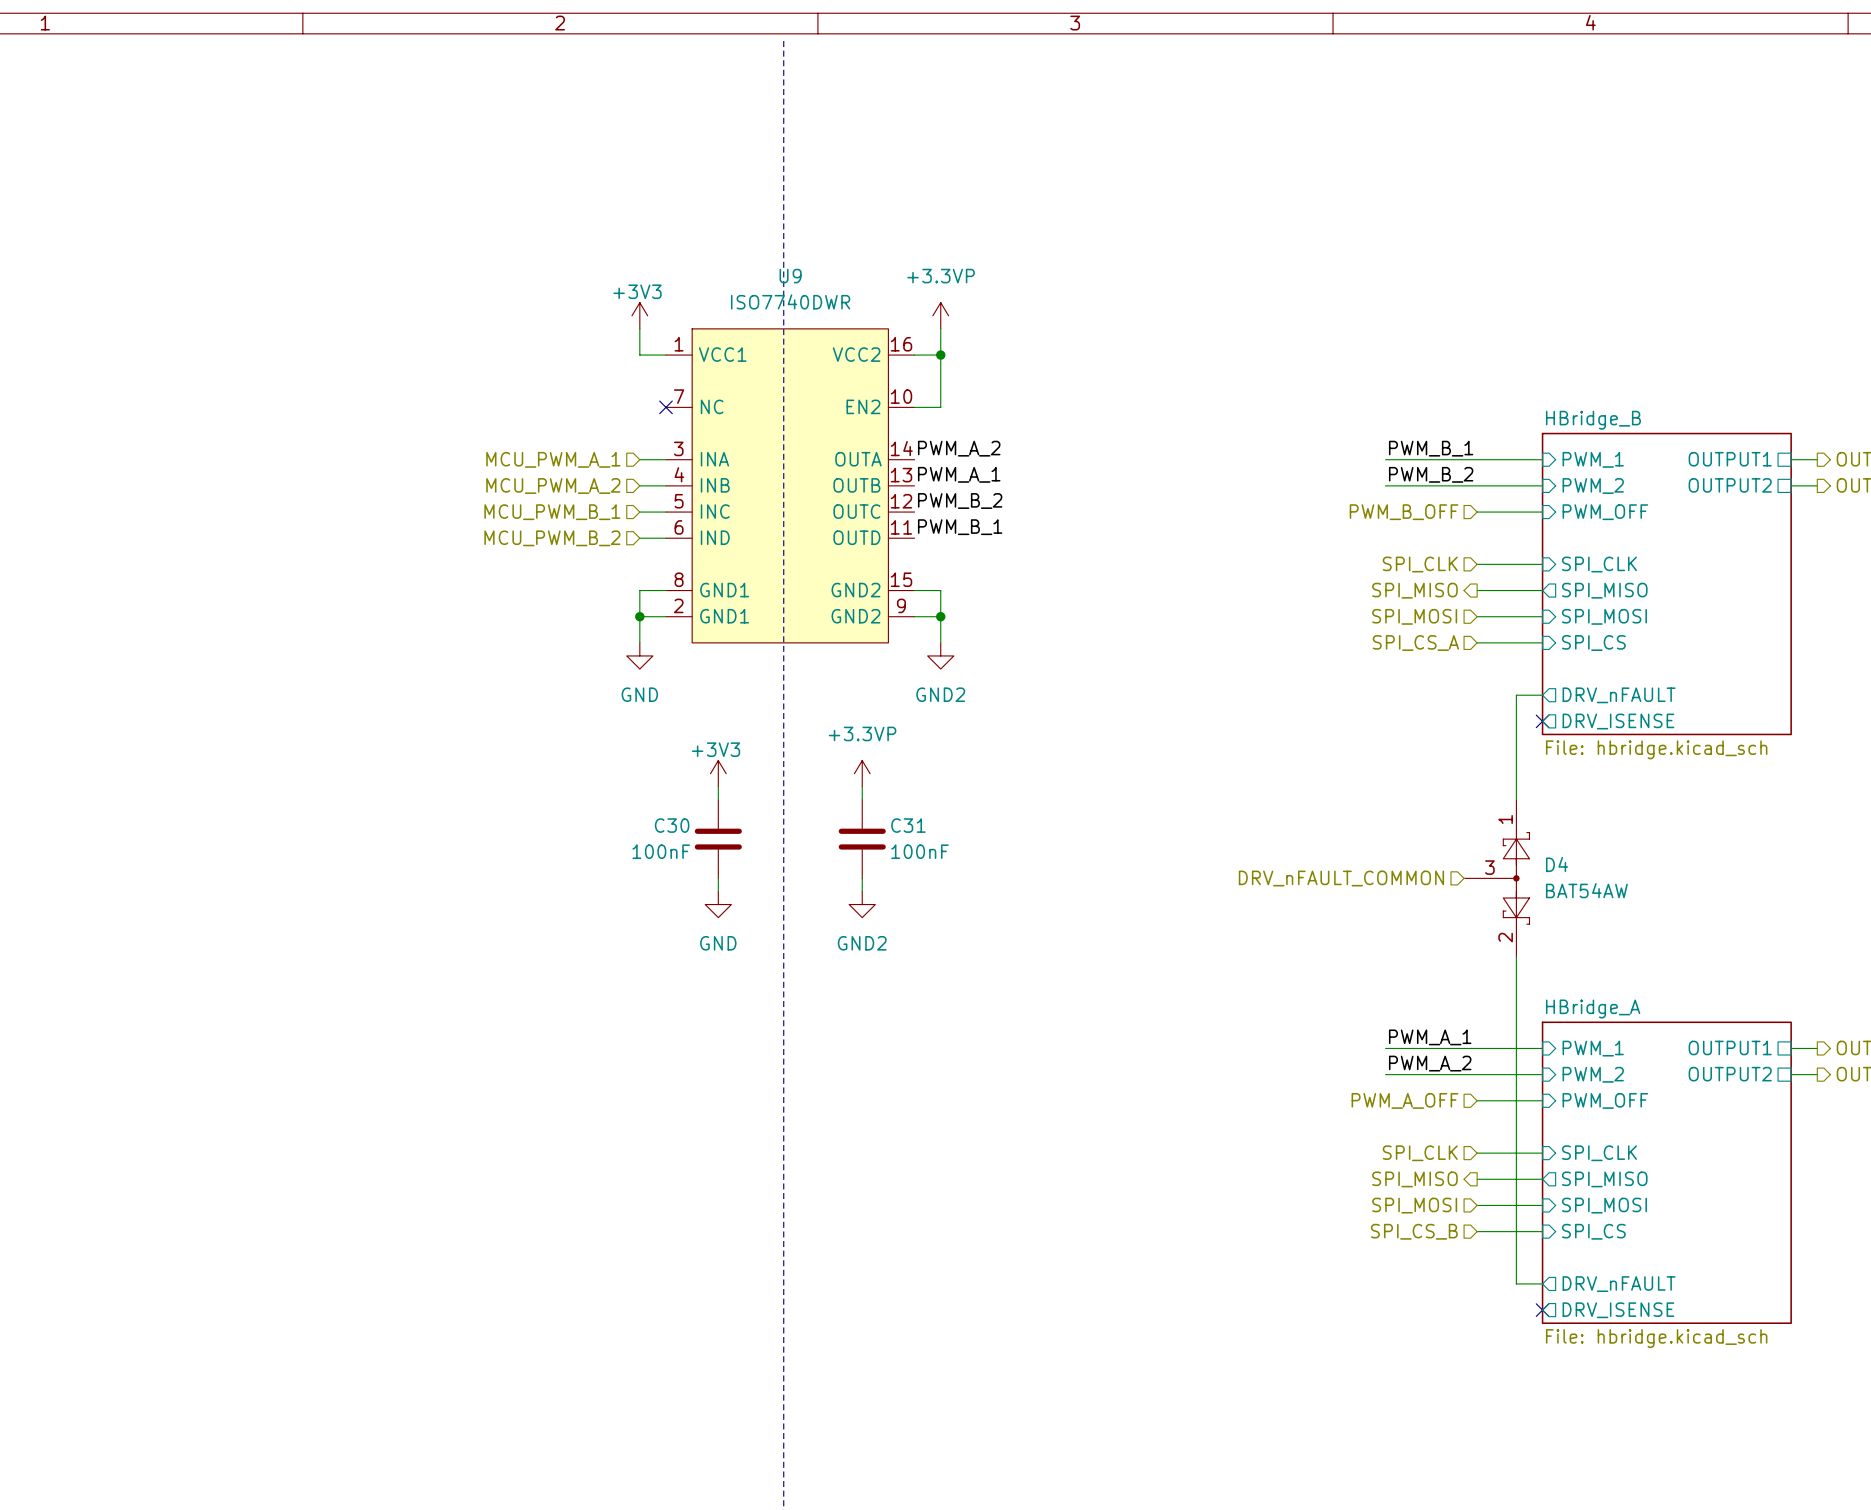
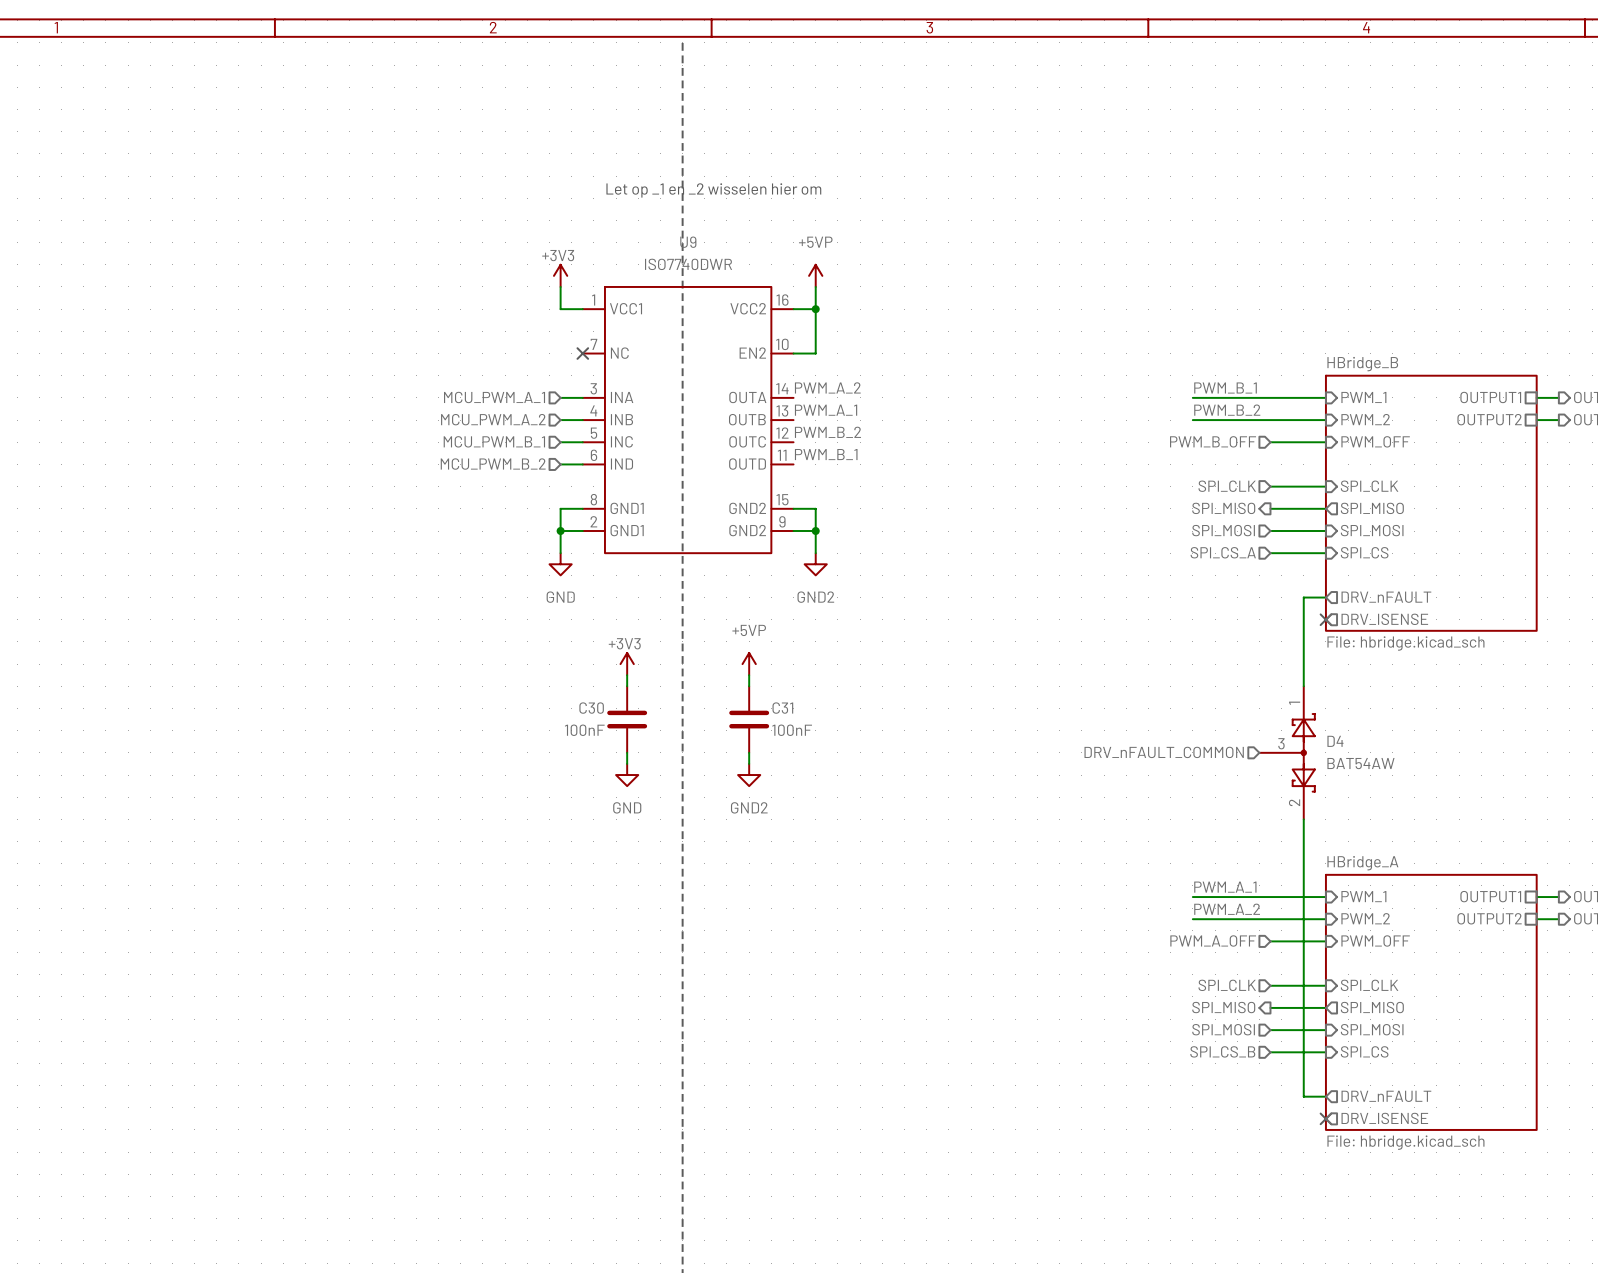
text: none -> Let op _1 en _2 wisselen hier om (713, 190)
power symbol: +3.3VP (940, 315) -> +5VP (815, 275)
power symbol: +3.3VP (862, 773) -> +5VP (749, 664)

